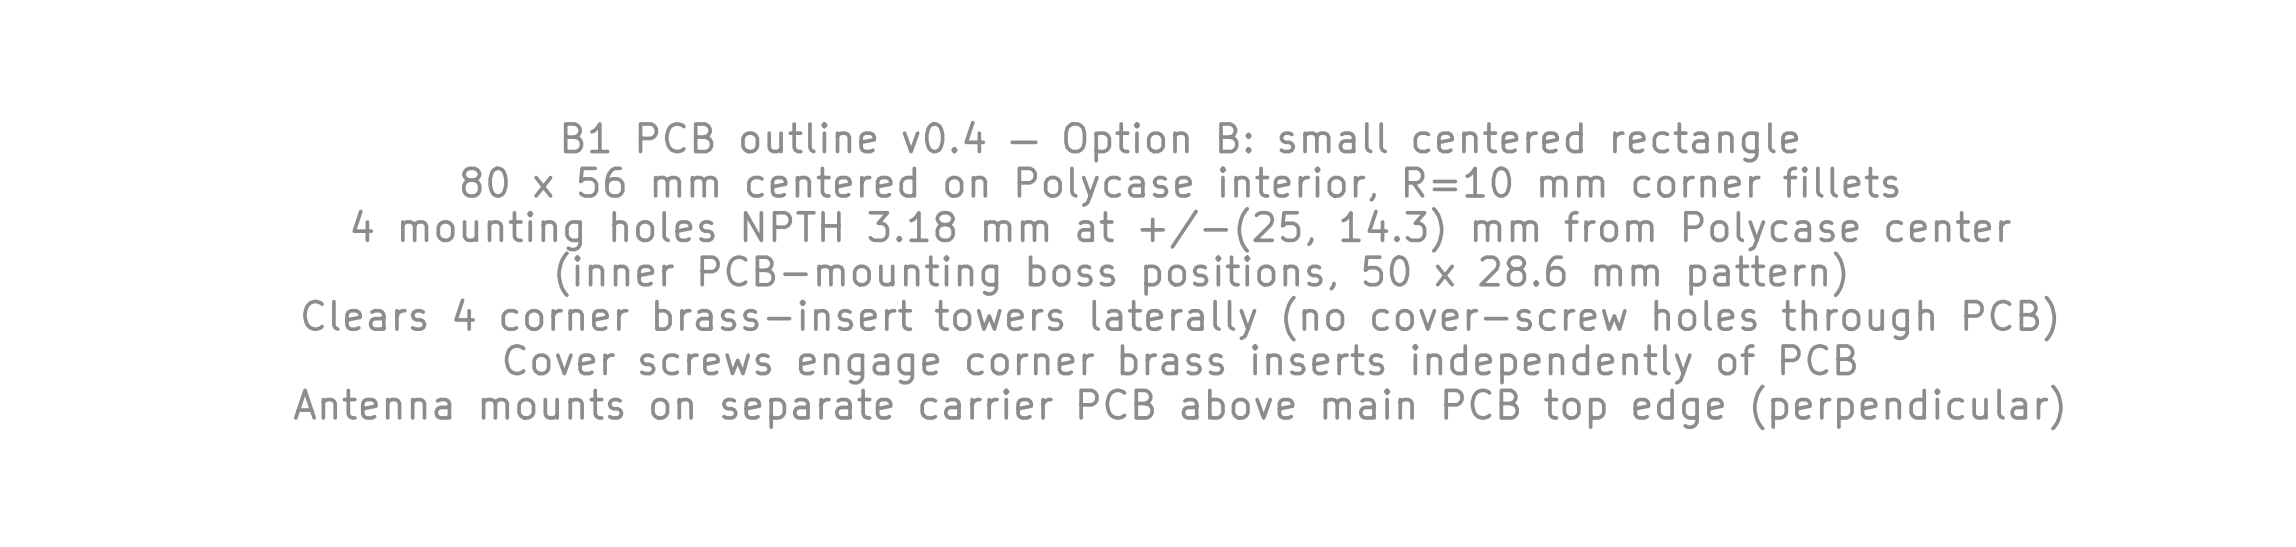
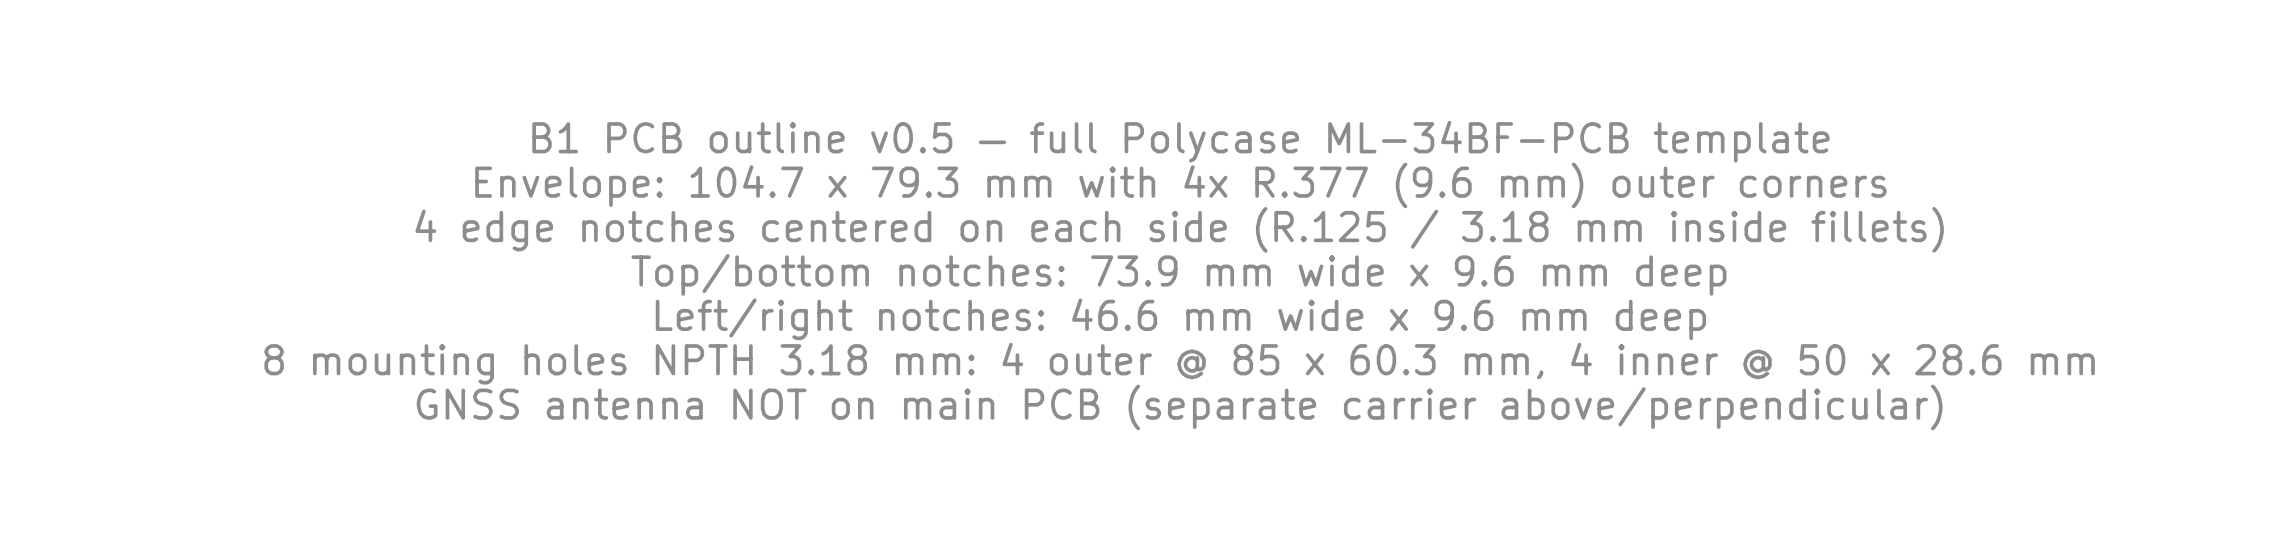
text: B1 PCB outline v0.4 — Option B: small centered rectangle (1180, 141) -> B1 PCB outline v0.5 — full Polycase ML-34BF-PCB template (1180, 141)
text: 80 x 56 mm centered on Polycase interior, R=10 mm corner fillets (1180, 186) -> Envelope: 104.7 x 79.3 mm with 4x R.377 (9.6 mm) outer corners (1180, 185)
text: 4 mounting holes NPTH 3.18 mm at +/-(25, 14.3) mm from Polycase center (1181, 229) -> 4 edge notches centered on each side (R.125 / 3.18 mm inside fillets) (1179, 229)
text: (inner PCB-mounting boss positions, 50 x 28.6 mm pattern) (1201, 274) -> Top/bottom notches: 73.9 mm wide x 9.6 mm deep (1178, 274)
text: Clears 4 corner brass-insert towers laterally (no cover-screw holes through PCB) (1179, 318) -> Left/right notches: 46.6 mm wide x 9.6 mm deep (1180, 319)
text: Cover screws engage corner brass inserts independently of PCB (1180, 364) -> 8 mounting holes NPTH 3.18 mm: 4 outer @ 85 x 60.3 mm, 4 inner @ 50 x 28.6 mm (1179, 363)
text: Antenna mounts on separate carrier PCB above main PCB top edge (perpendicular) (1178, 407) -> GNSS antenna NOT on main PCB (separate carrier above/perpendicular) (1179, 407)

